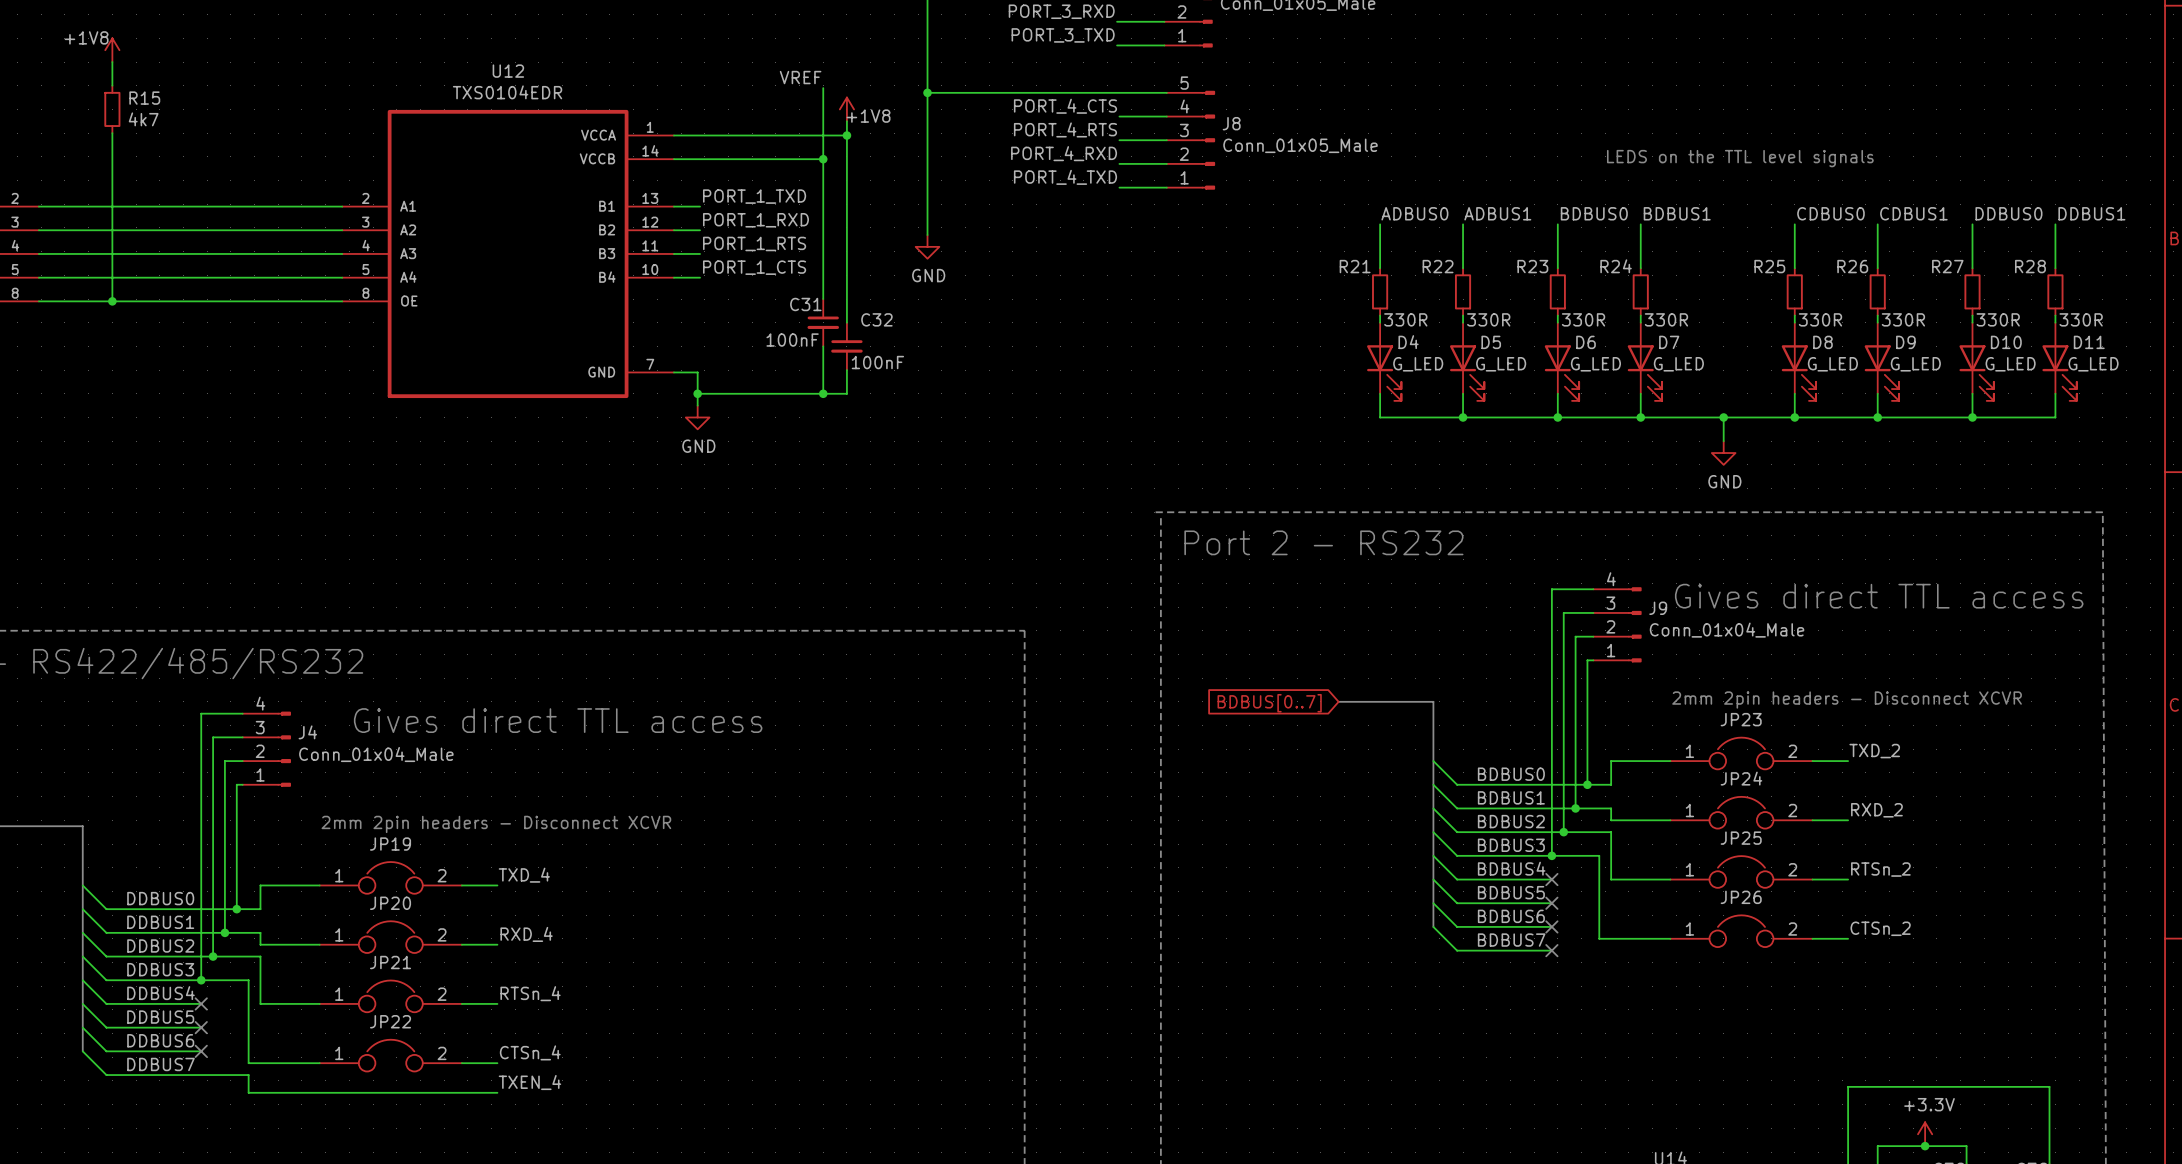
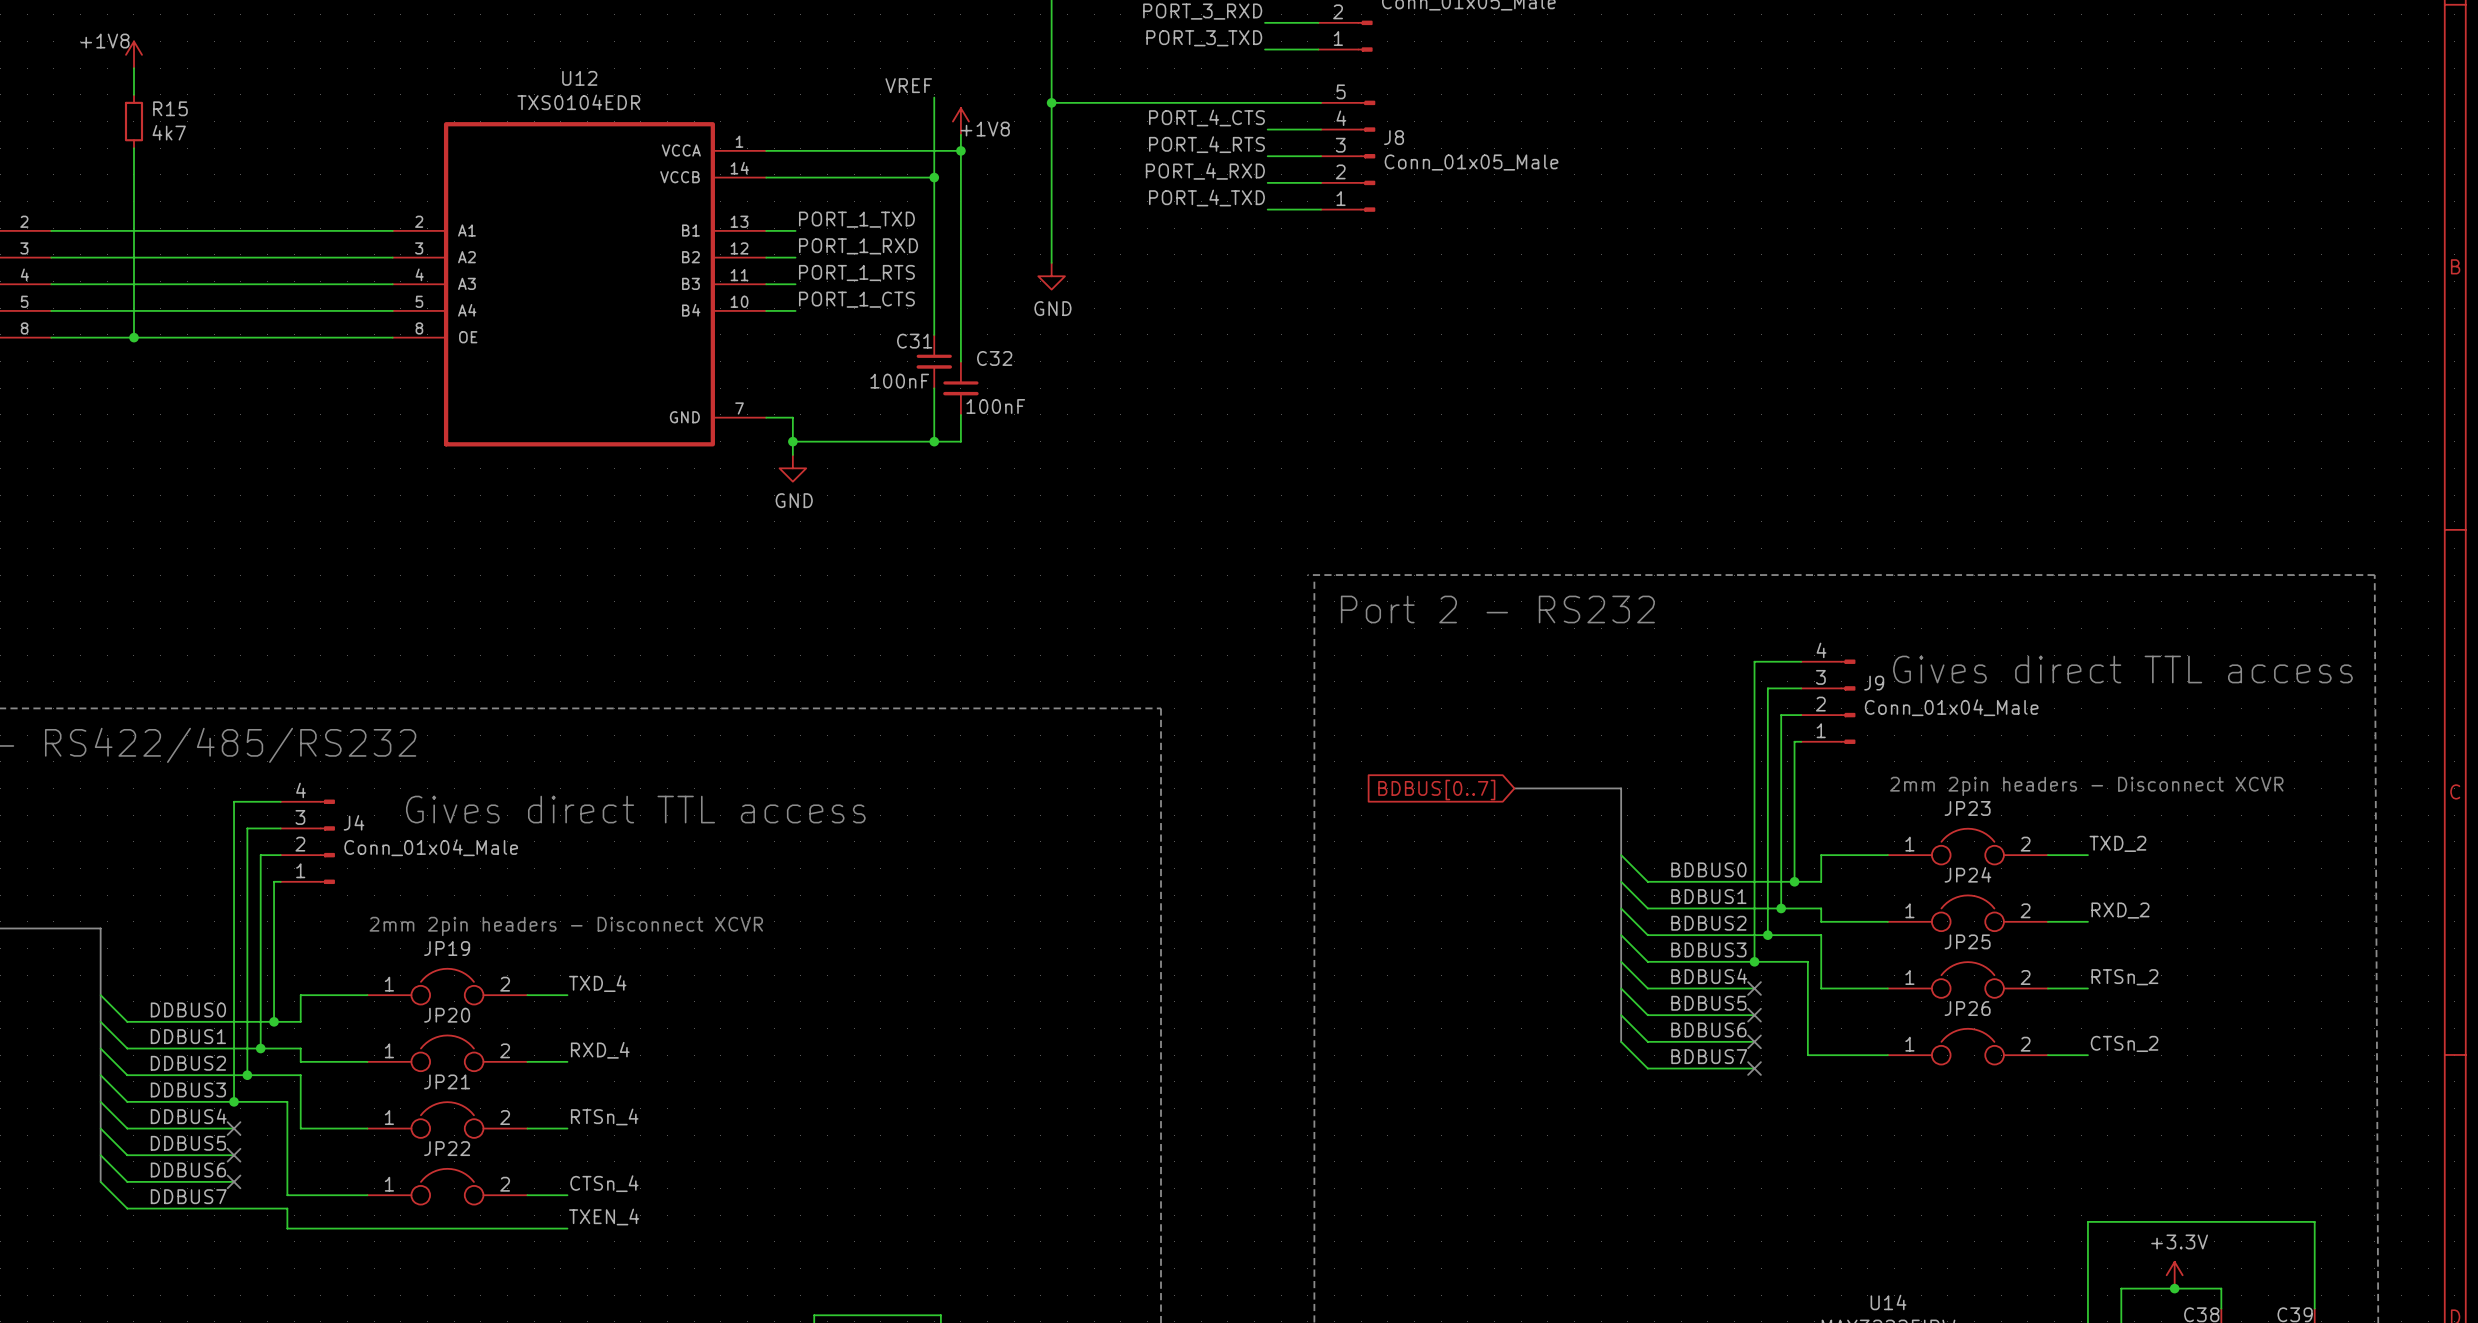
text: LEDS on the TTL level signals (1740, 158) -> none
label: ADBUS0 (1414, 213) -> none
label: ADBUS1 (1497, 213) -> none
label: BDBUS0 (1594, 213) -> none
label: BDBUS1 (1677, 213) -> none
label: CDBUS0 (1830, 213) -> none
label: CDBUS1 (1913, 213) -> none
label: DDBUS0 (2008, 213) -> none
label: DDBUS1 (2091, 213) -> none
wire: (1380, 224) (1380, 268) -> none
wire: (1463, 224) (1463, 268) -> none
wire: (1557, 224) (1557, 268) -> none
wire: (1640, 224) (1640, 268) -> none
wire: (1794, 224) (1794, 268) -> none
wire: (1877, 224) (1877, 268) -> none
wire: (1972, 224) (1972, 268) -> none
wire: (2055, 224) (2055, 268) -> none
R21: 330R (1380, 291) -> none
R22: 330R (1463, 291) -> none
R23: 330R (1557, 291) -> none
R24: 330R (1640, 291) -> none
R25: 330R (1794, 291) -> none
R26: 330R (1877, 291) -> none
R27: 330R (1972, 291) -> none
R28: 330R (2055, 291) -> none
wire: (1380, 315) (1380, 322) -> none
wire: (1463, 315) (1463, 322) -> none
wire: (1557, 315) (1557, 322) -> none
wire: (1640, 315) (1640, 322) -> none
wire: (1794, 315) (1794, 322) -> none
wire: (1877, 315) (1877, 322) -> none
wire: (1972, 315) (1972, 322) -> none
wire: (2055, 315) (2055, 322) -> none
D4: G_LED (1384, 361) -> none
D5: G_LED (1467, 361) -> none
D6: G_LED (1561, 361) -> none
D7: G_LED (1644, 361) -> none
D8: G_LED (1798, 361) -> none
D9: G_LED (1881, 361) -> none
D10: G_LED (1976, 361) -> none
D11: G_LED (2059, 361) -> none
wire: (1380, 393) (1380, 417) (2055, 417) (2055, 393) -> none
wire: (1463, 393) (1463, 417) -> none
wire: (1557, 393) (1557, 417) -> none
wire: (1640, 393) (1640, 417) -> none
wire: (1794, 393) (1794, 417) -> none
wire: (1877, 393) (1877, 417) -> none
wire: (1972, 393) (1972, 417) -> none
junction: (1463, 417) -> none
junction: (1557, 417) -> none
junction: (1640, 417) -> none
wire: (1723, 417) (1723, 441) -> none
junction: (1723, 417) -> none
junction: (1794, 417) -> none
junction: (1877, 417) -> none
junction: (1972, 417) -> none
power symbol: GND (1723, 453) -> none

